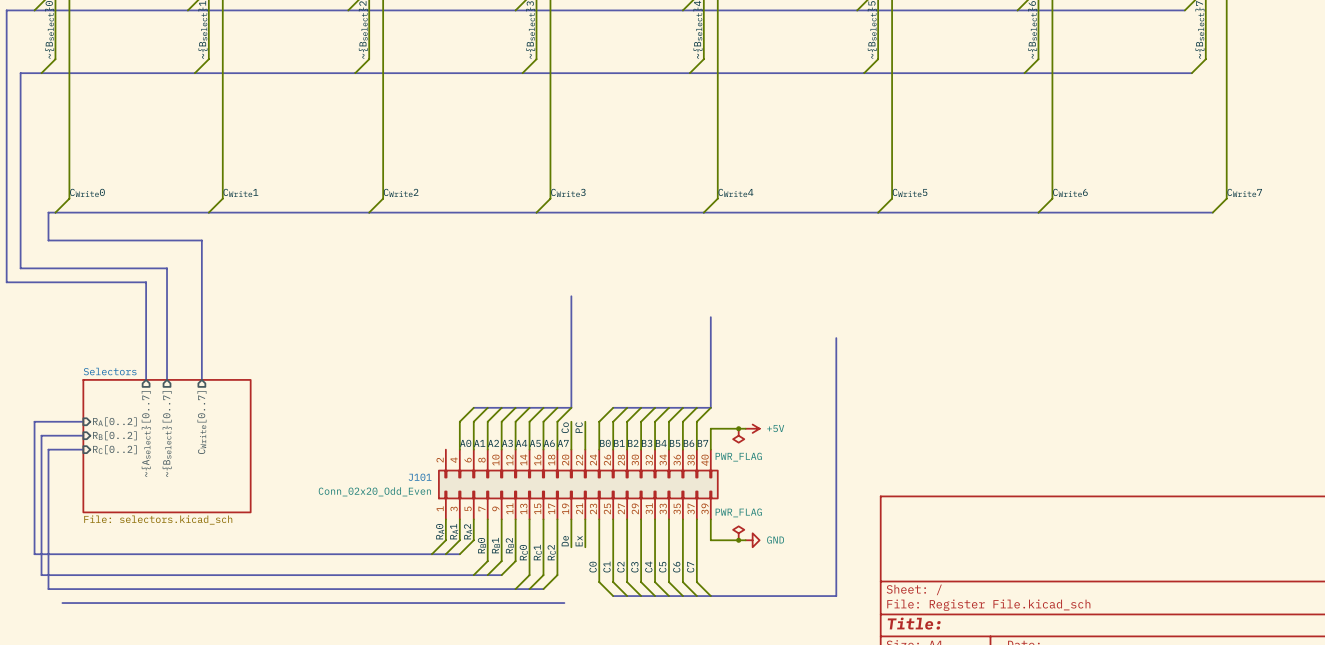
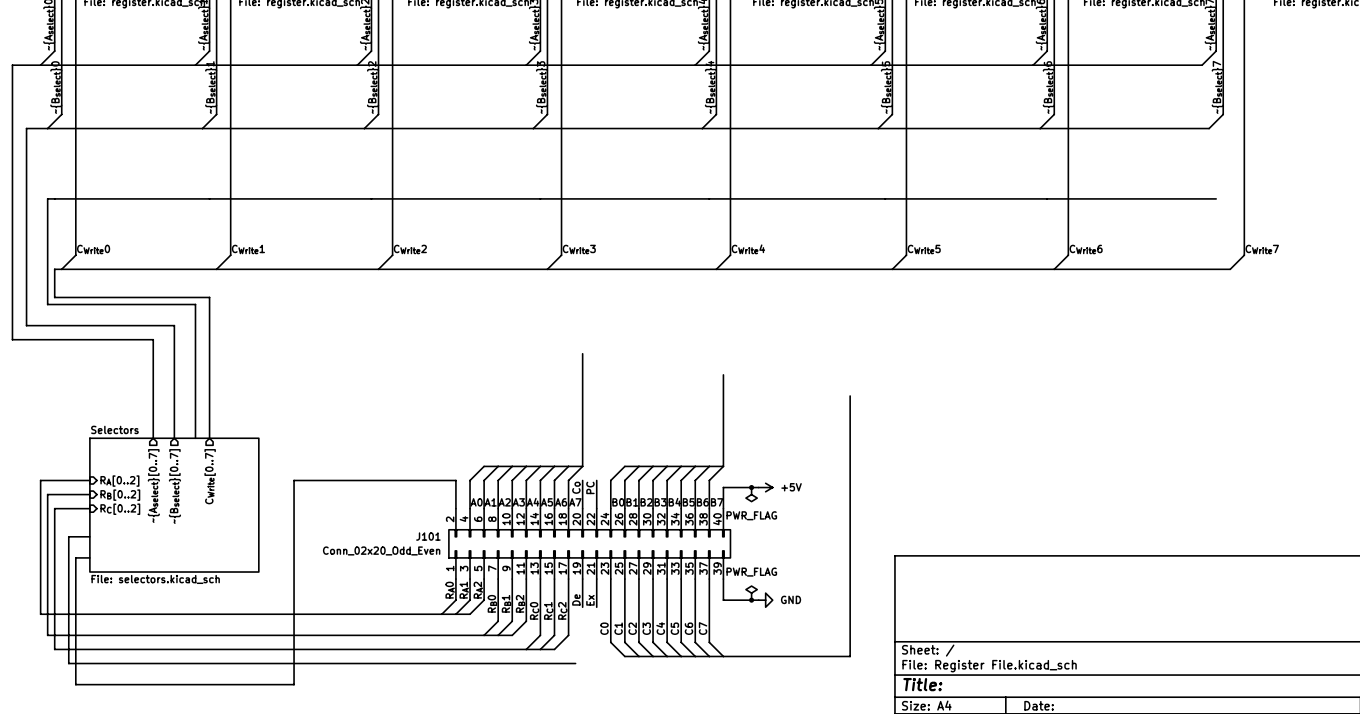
bus: none -> (1216, 198) (47, 198) (47, 304) (195, 304) (195, 438)
wire: none -> (455, 508) (455, 480) (294, 480) (294, 684) (75, 684) (75, 557) (89, 557)
bus: none -> (89, 536) (68, 536) (68, 663)

